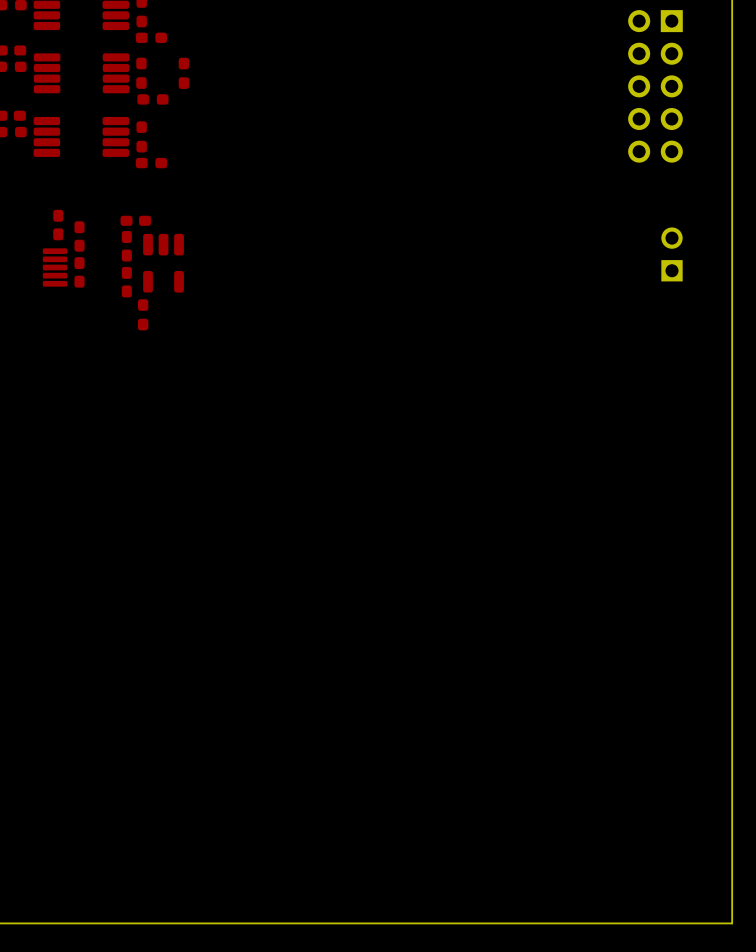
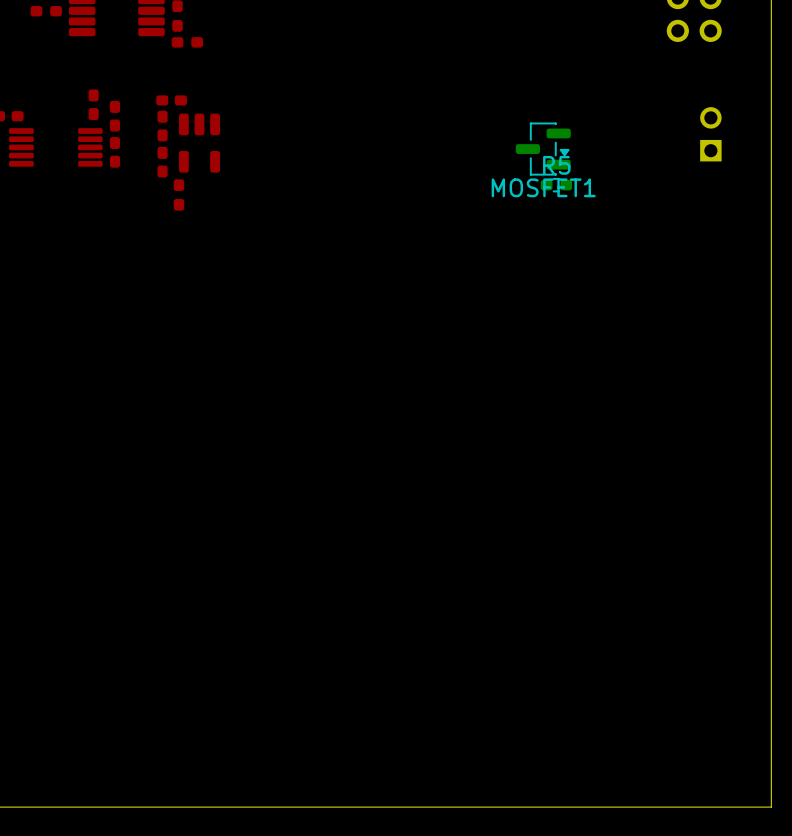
MOSFET1: none -> (543, 149)
R5: none -> (556, 185)

